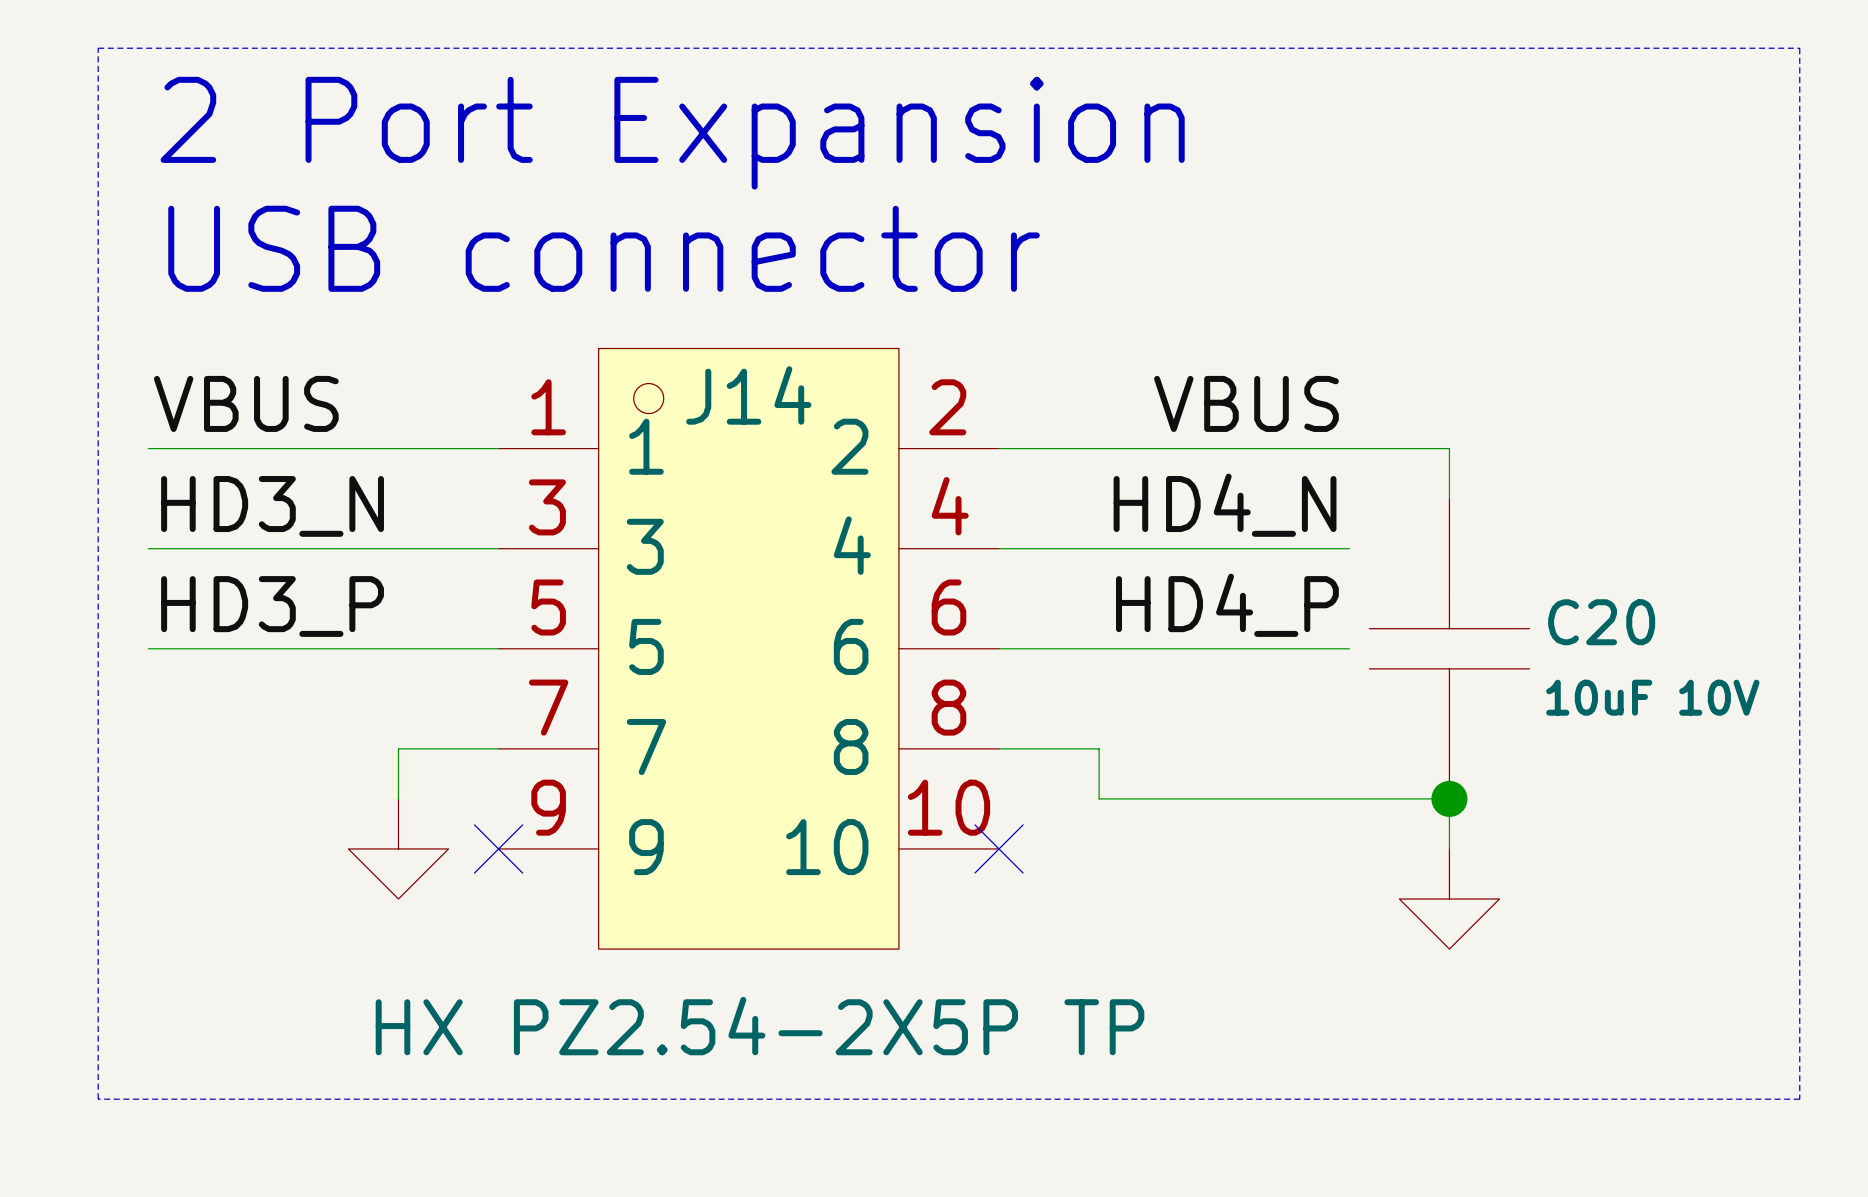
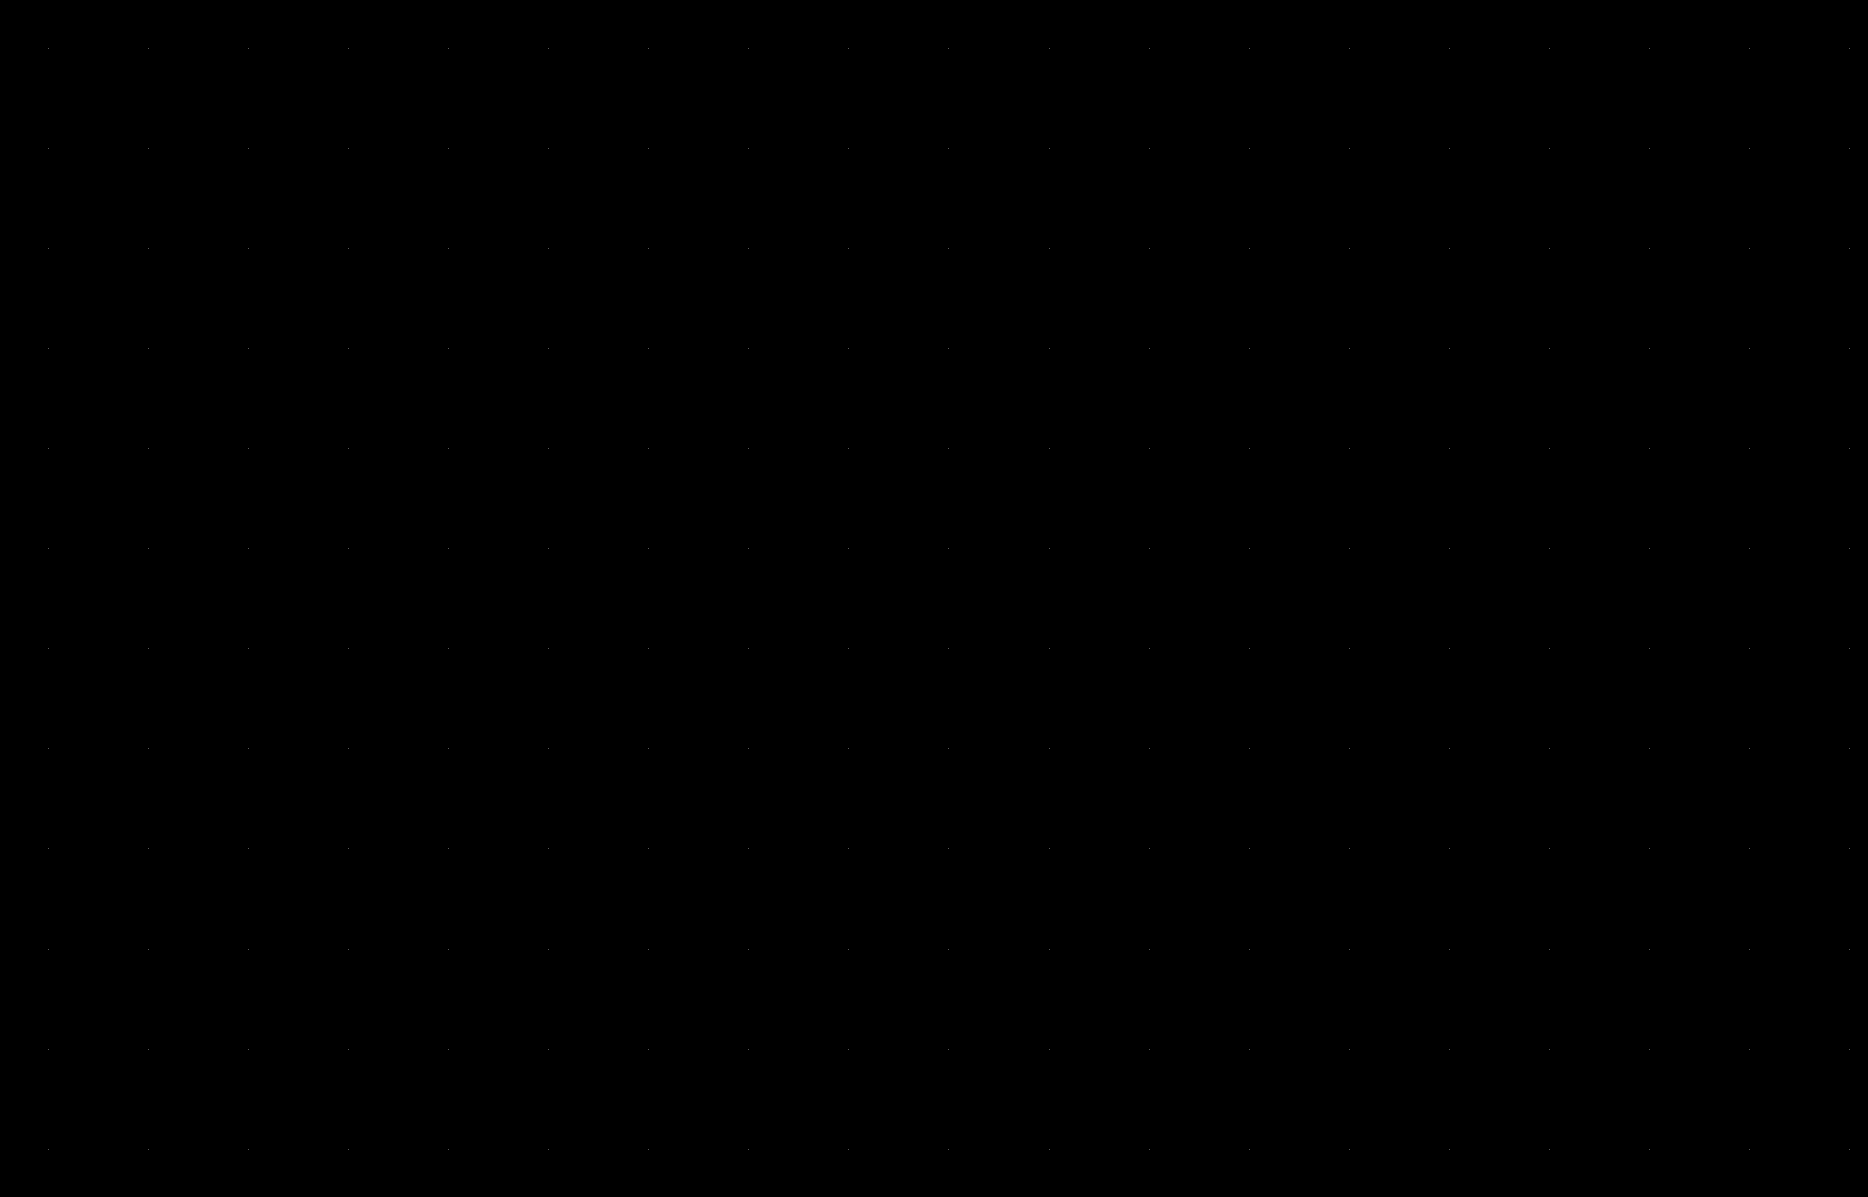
line: (98, 48) (1799, 48) (1799, 1099) (98, 1099) (98, 48) -> none
text: 2 Port Expansion (672, 133) -> none
text: USB connector (604, 248) -> none
label: VBUS (246, 403) -> none
label: VBUS (1246, 403) -> none
wire: (148, 448) (498, 448) -> none
wire: (999, 448) (1449, 448) (1449, 498) -> none
label: HD4_N (1225, 505) -> none
label: HD3_N (272, 506) -> none
wire: (148, 548) (498, 548) -> none
wire: (999, 548) (1349, 548) -> none
label: HD4_P (1227, 605) -> none
label: HD3_P (272, 606) -> none
wire: (148, 648) (498, 648) -> none
J14: HX PZ2.54-2X5P TP (748, 648) -> none
wire: (999, 648) (1349, 648) -> none
C20: 10uF 10V (1449, 648) -> none
wire: (498, 748) (398, 748) (398, 798) -> none
wire: (999, 748) (1099, 748) (1099, 798) (1449, 798) (1449, 848) -> none
junction: (1449, 798) -> none
power symbol: (398, 848) -> none
no-connect mark: (498, 848) -> none
no-connect mark: (999, 848) -> none
power symbol: (1449, 899) -> none

